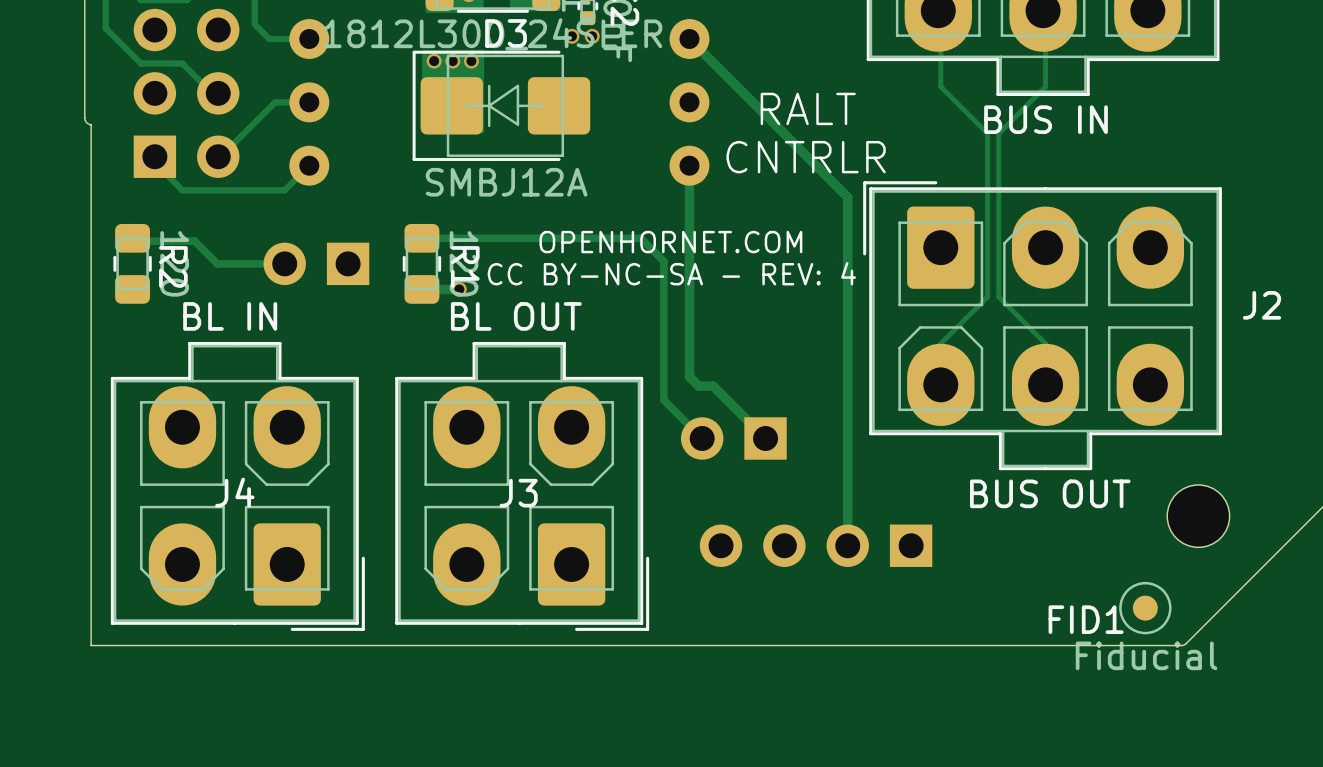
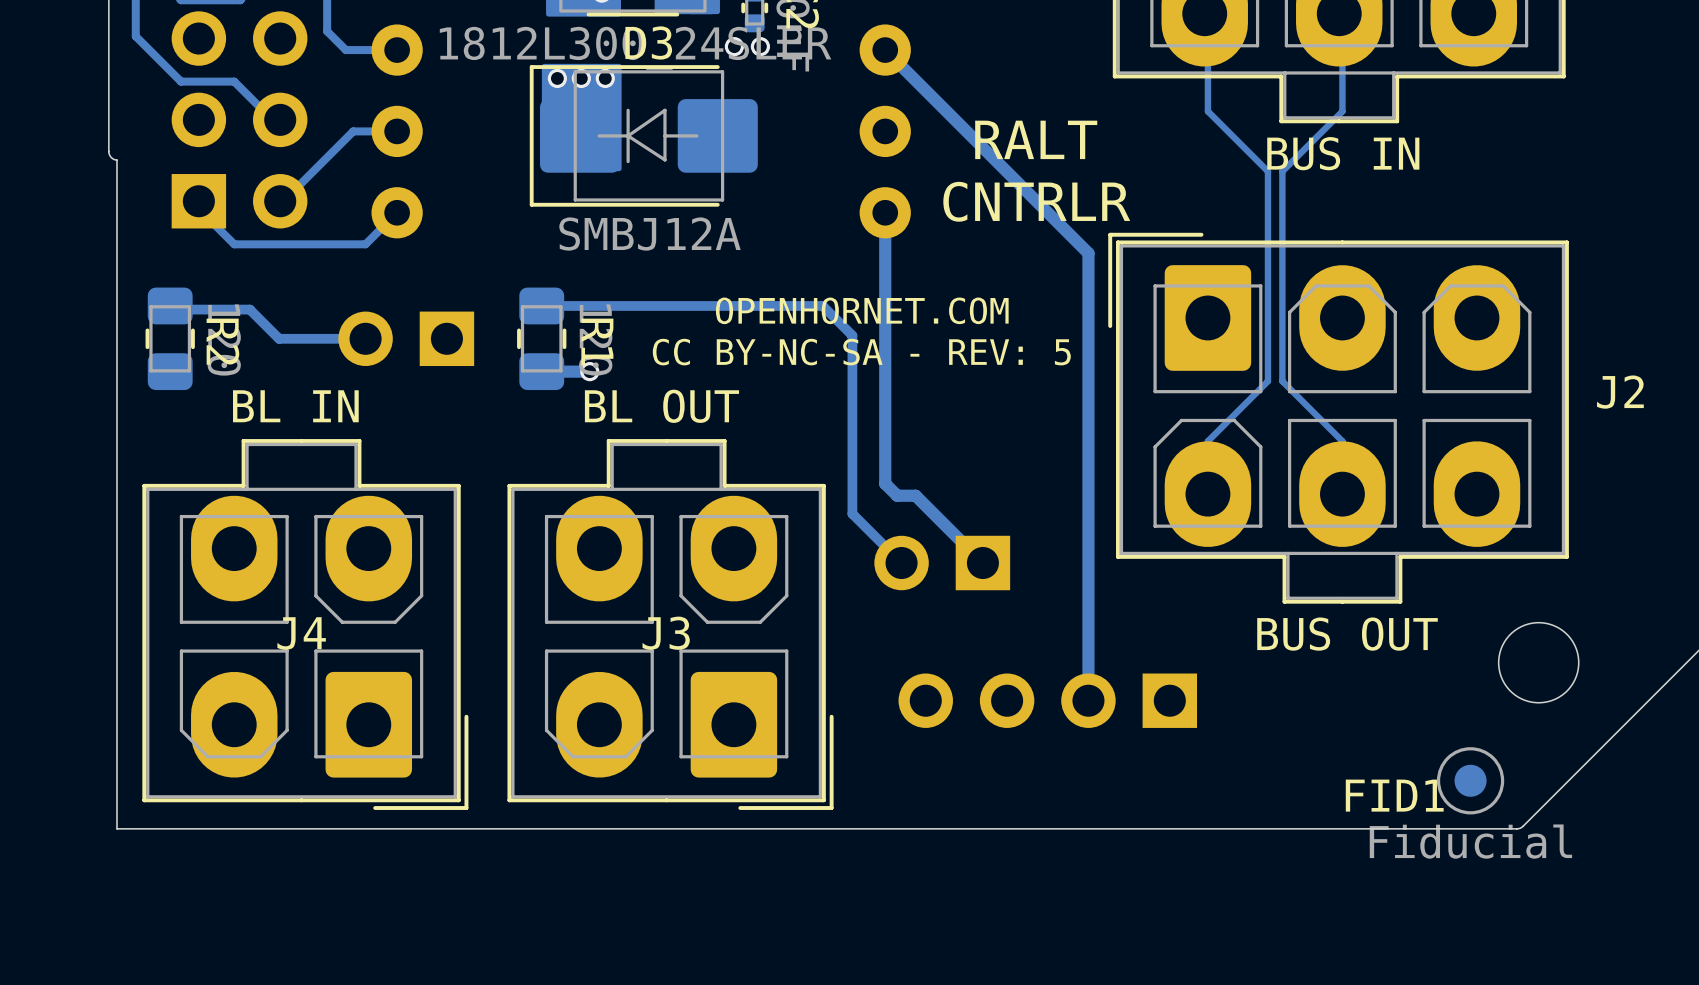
text: CC BY-NC-SA - REV: 4 (671, 273) -> CC BY-NC-SA - REV: 5 (861, 352)

